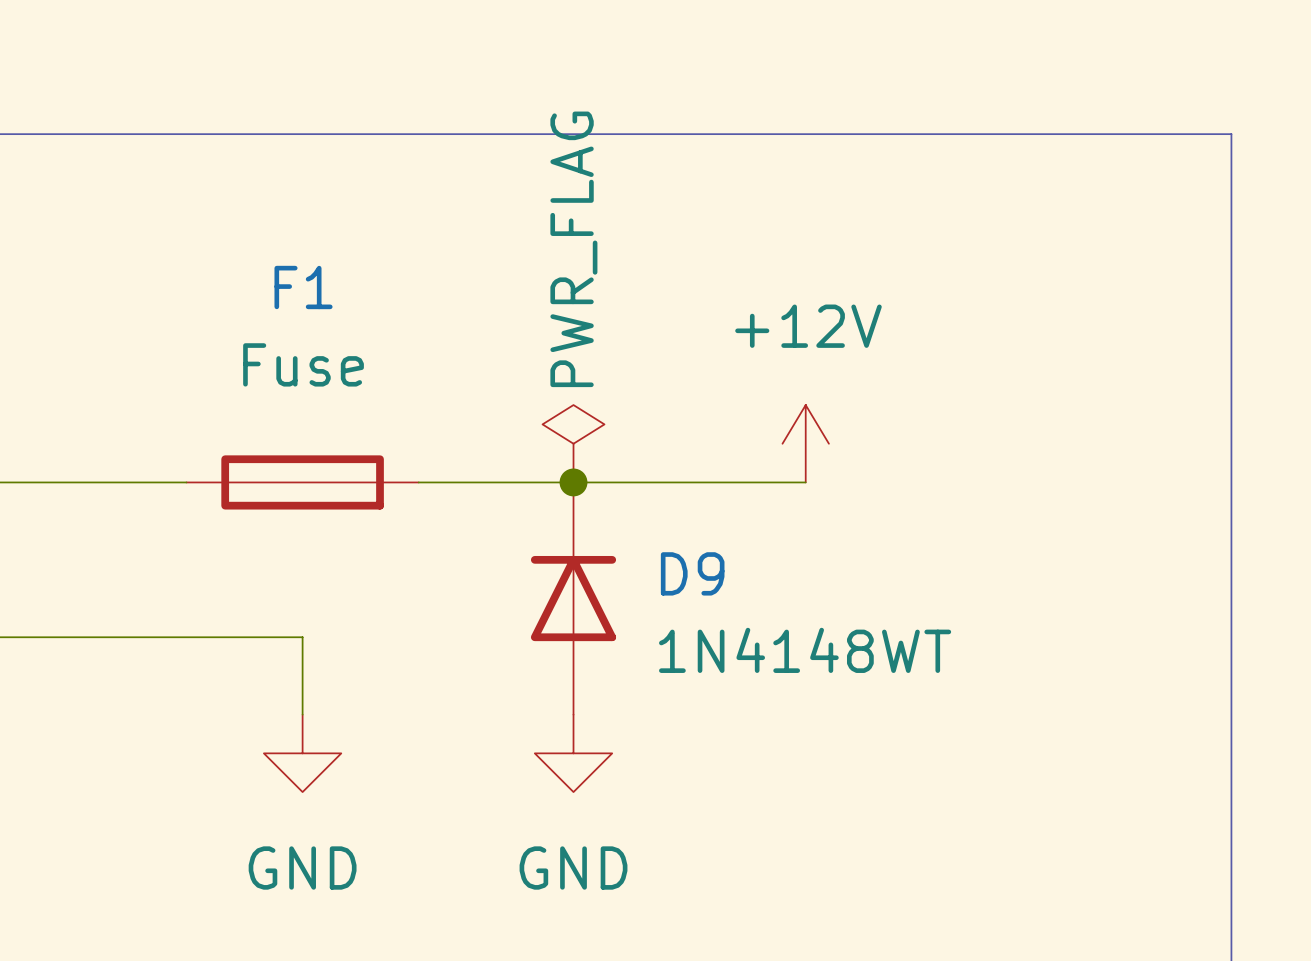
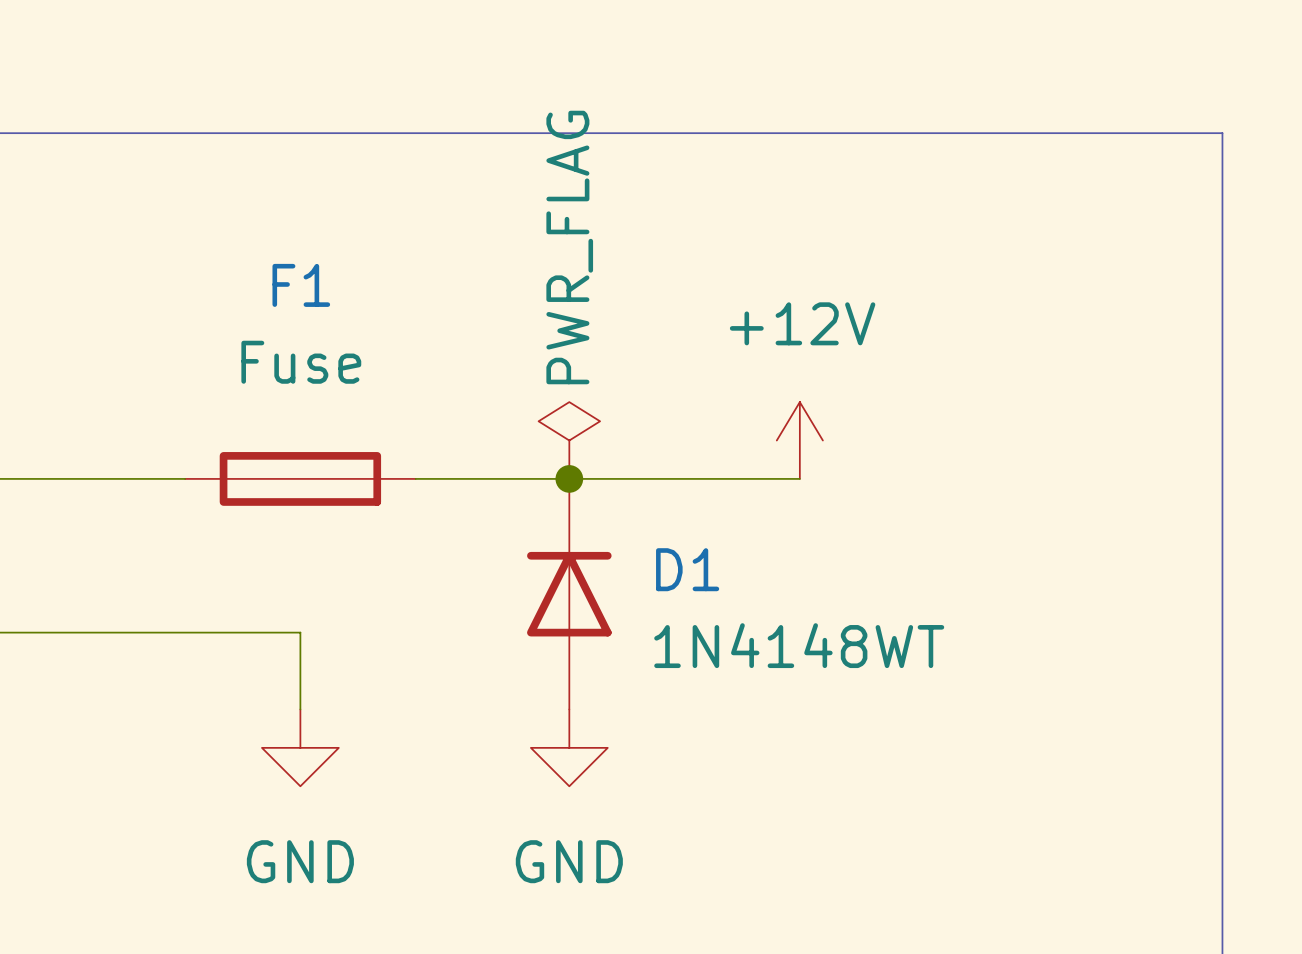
D9 name: D9 (692, 573) -> D1 (687, 569)

